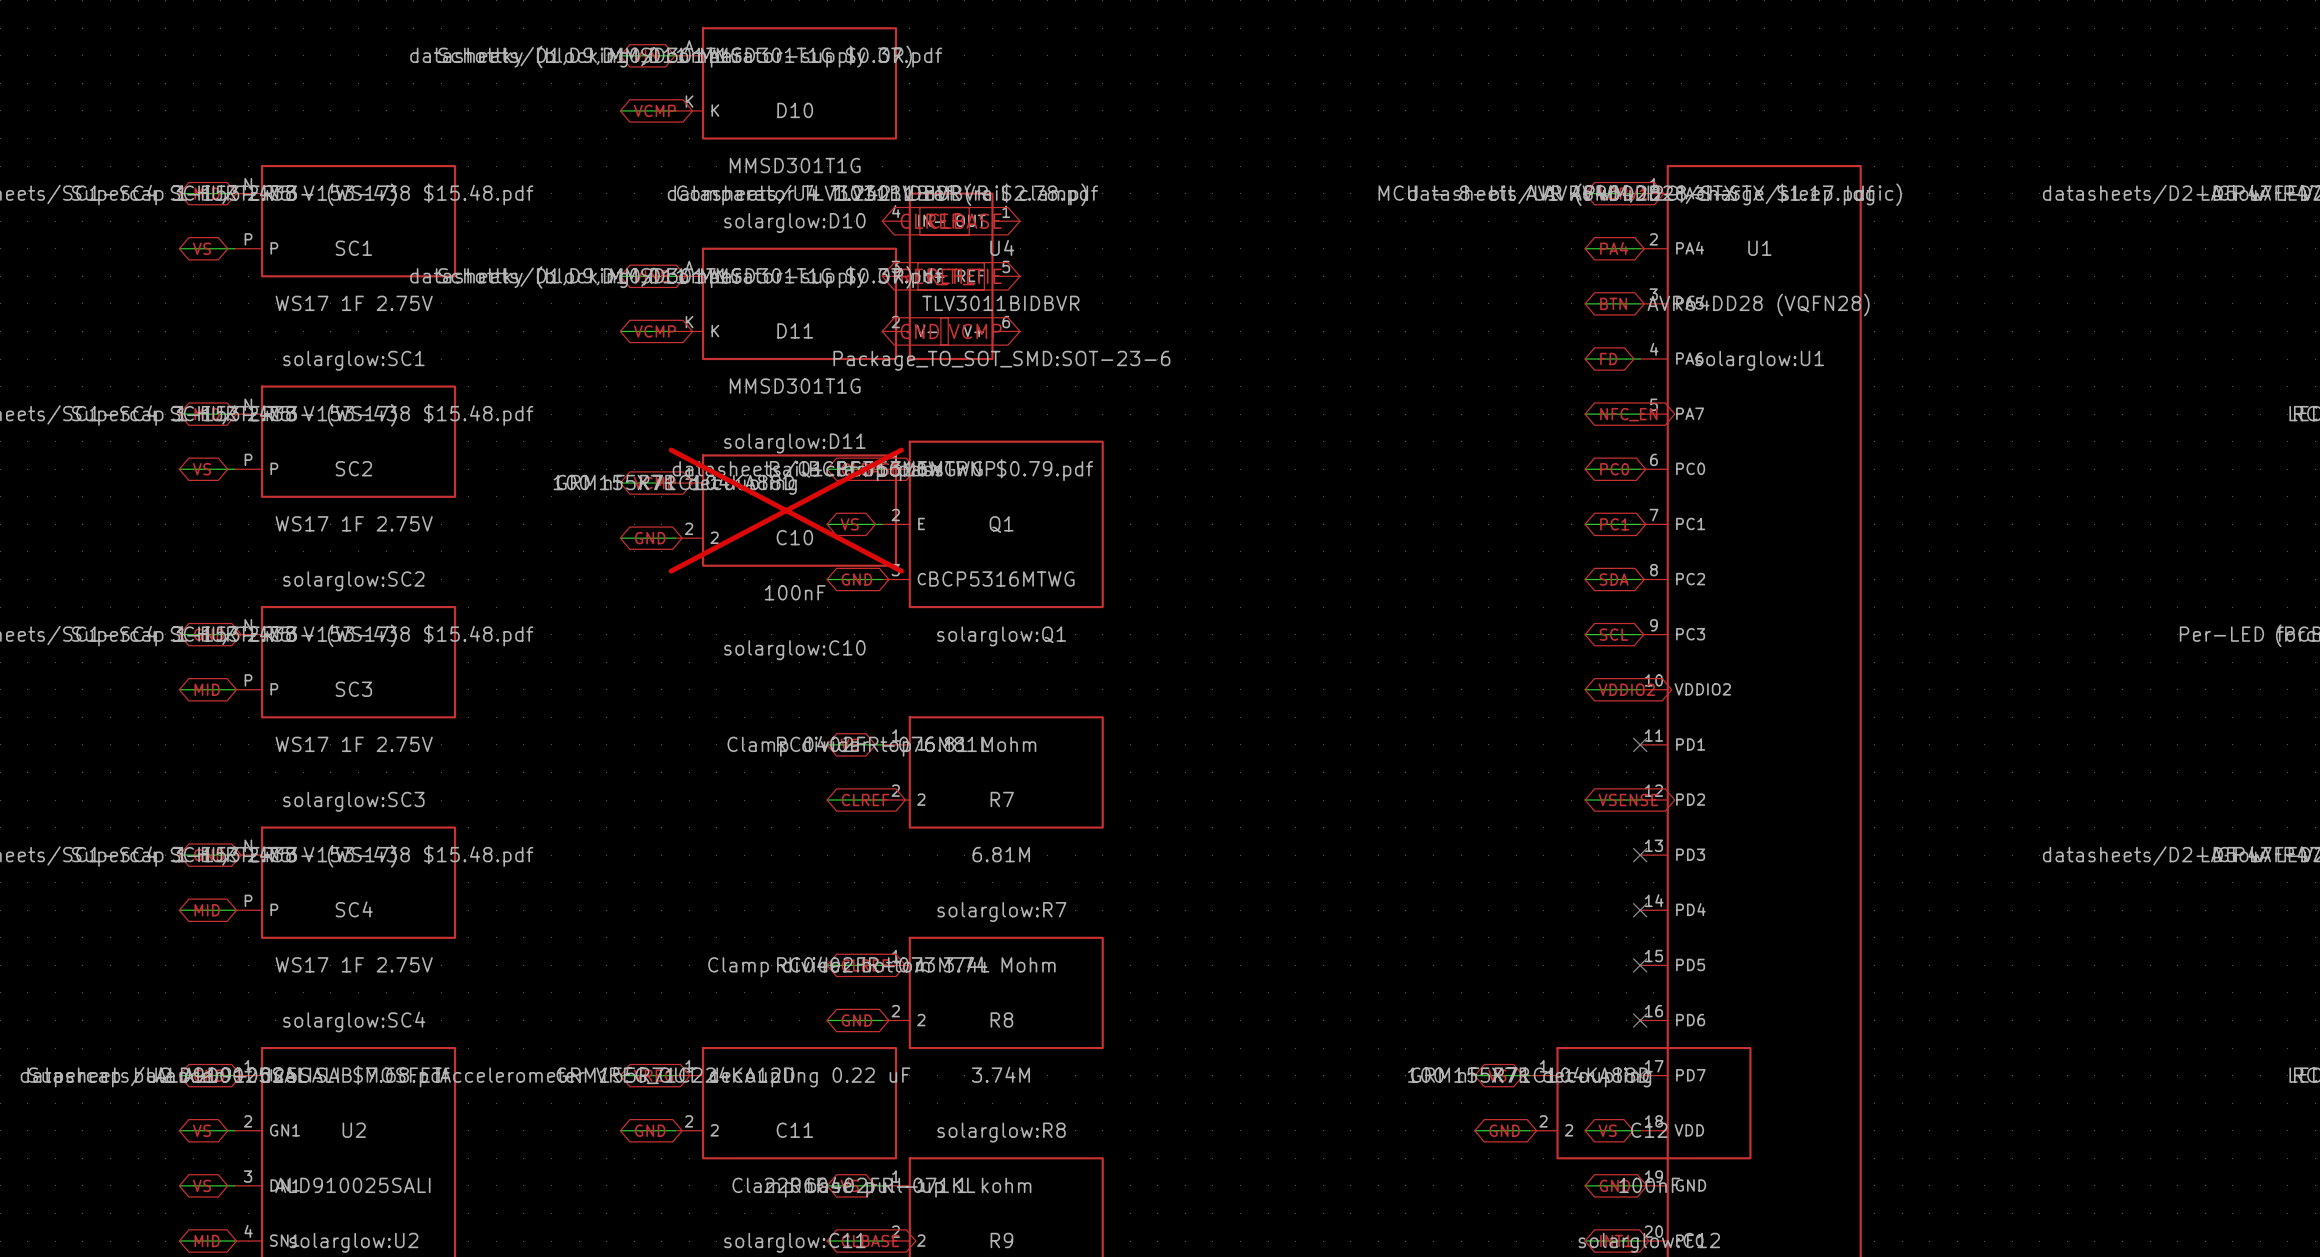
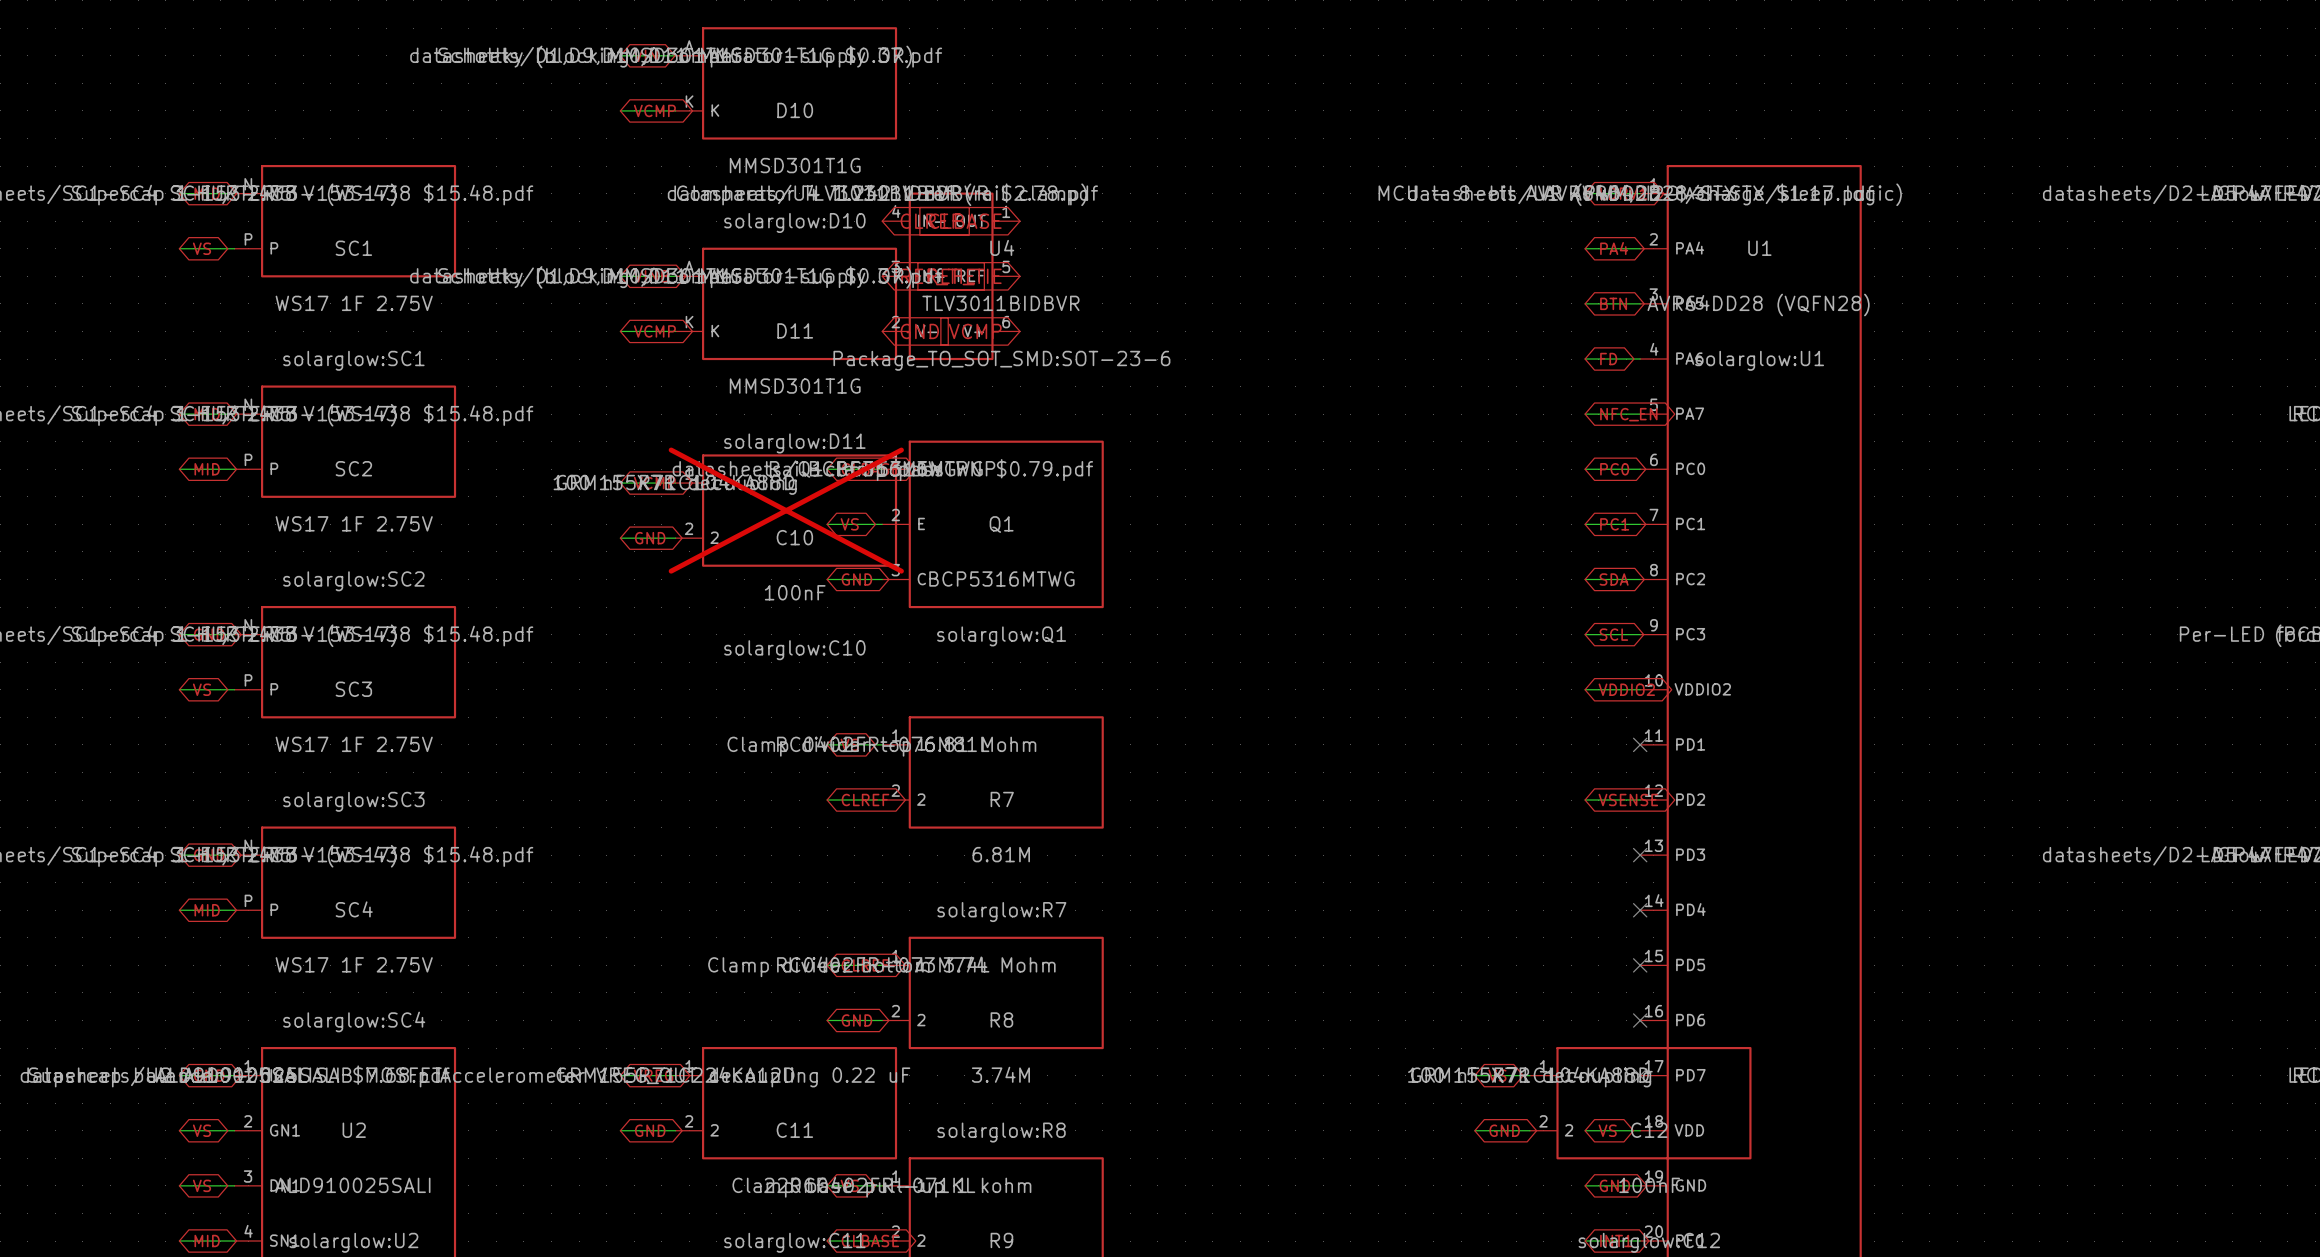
global label: VS (201, 469) -> MID (207, 469)
global label: MID (207, 689) -> VS (201, 689)

